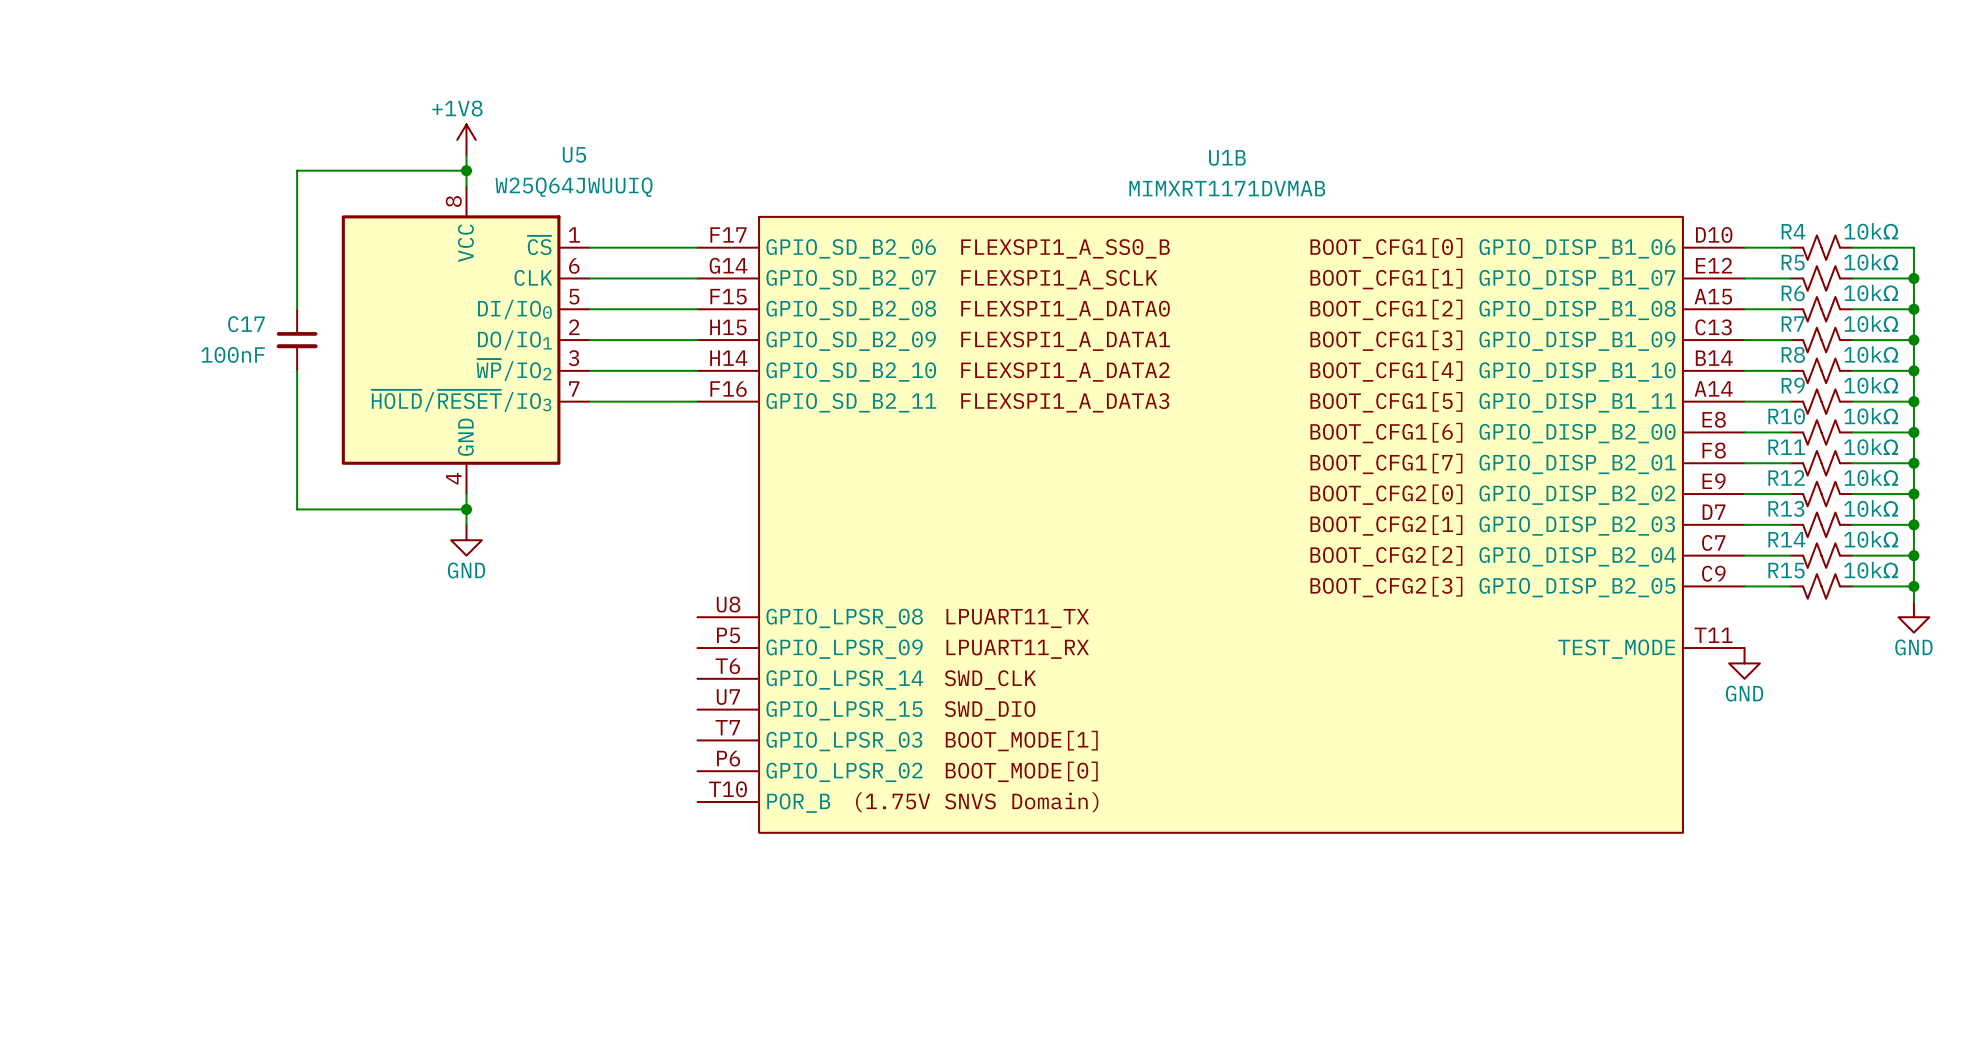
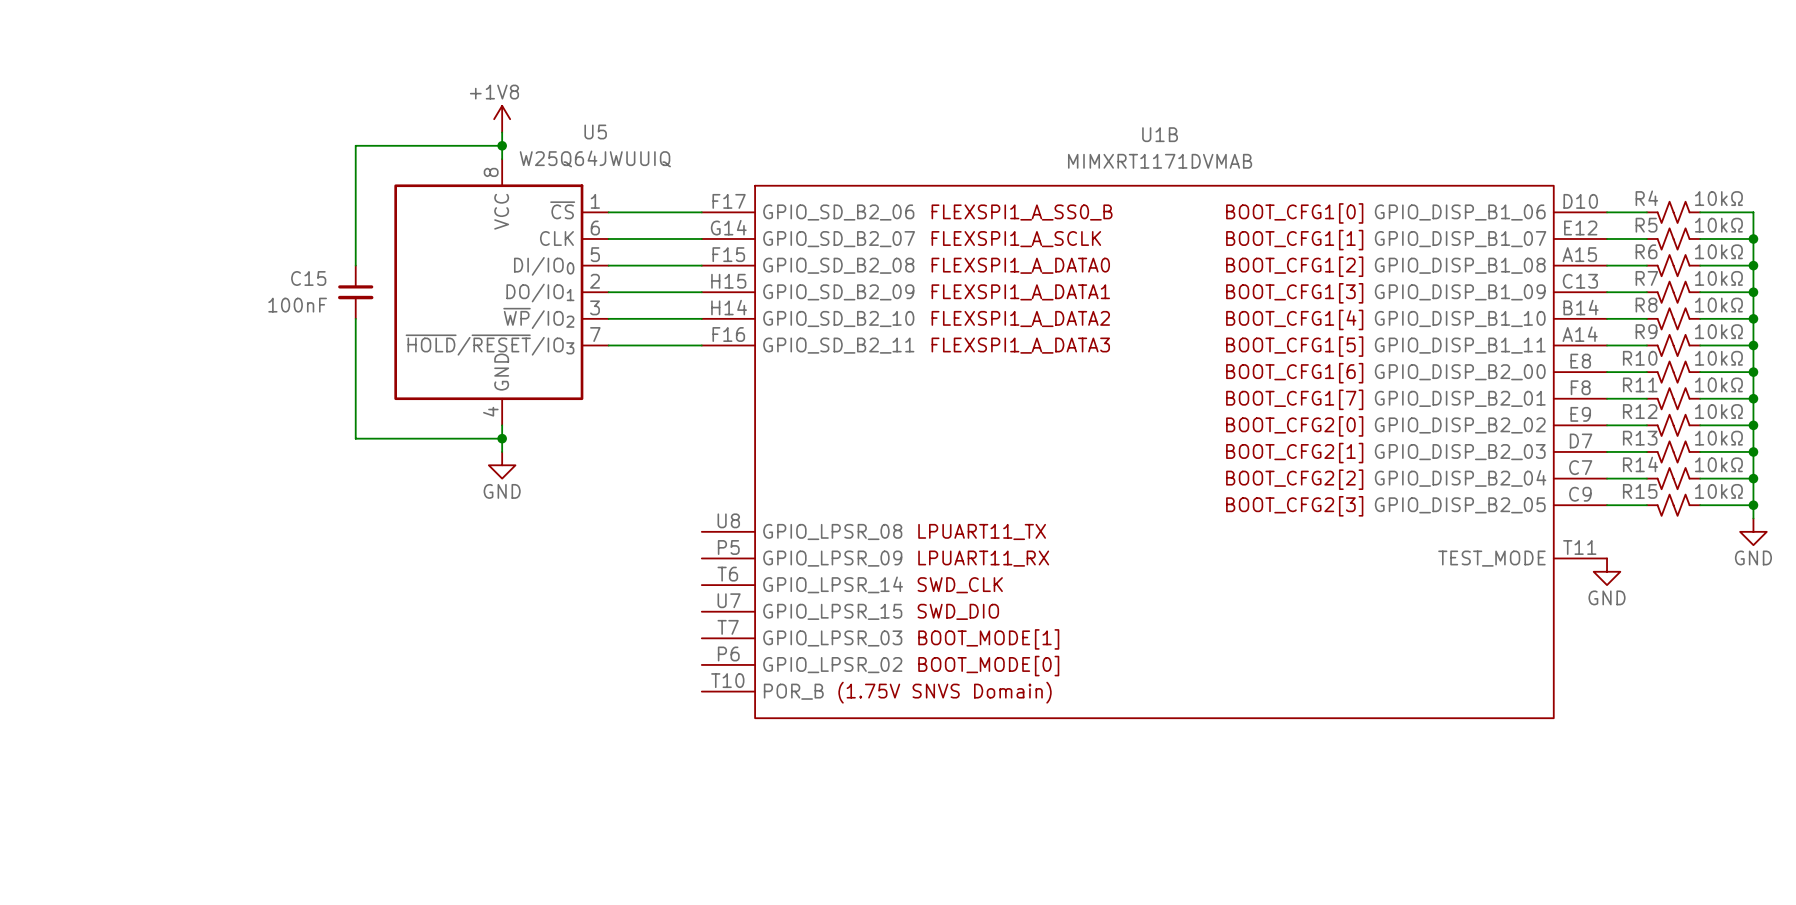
C17 name: C17 (246, 324) -> C15 (308, 278)

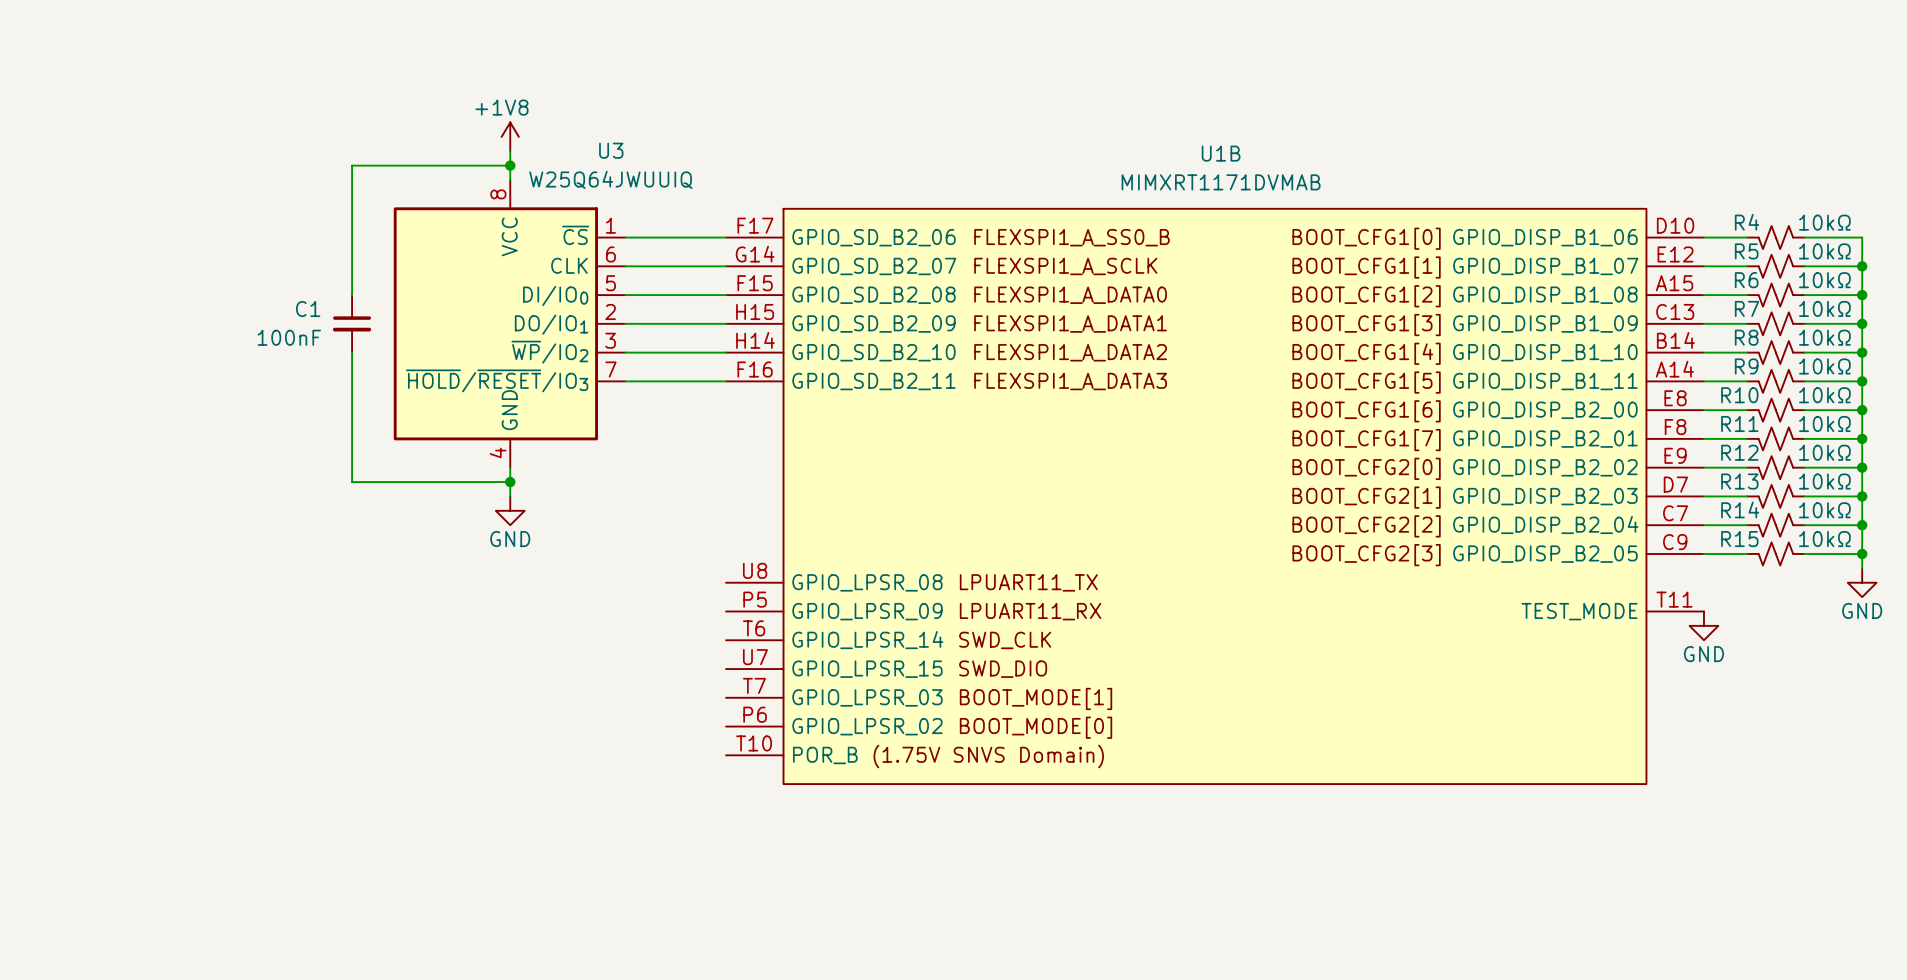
U5 name: U5 (595, 132) -> U3 (611, 150)
C15 name: C15 (308, 278) -> C1 (308, 309)

